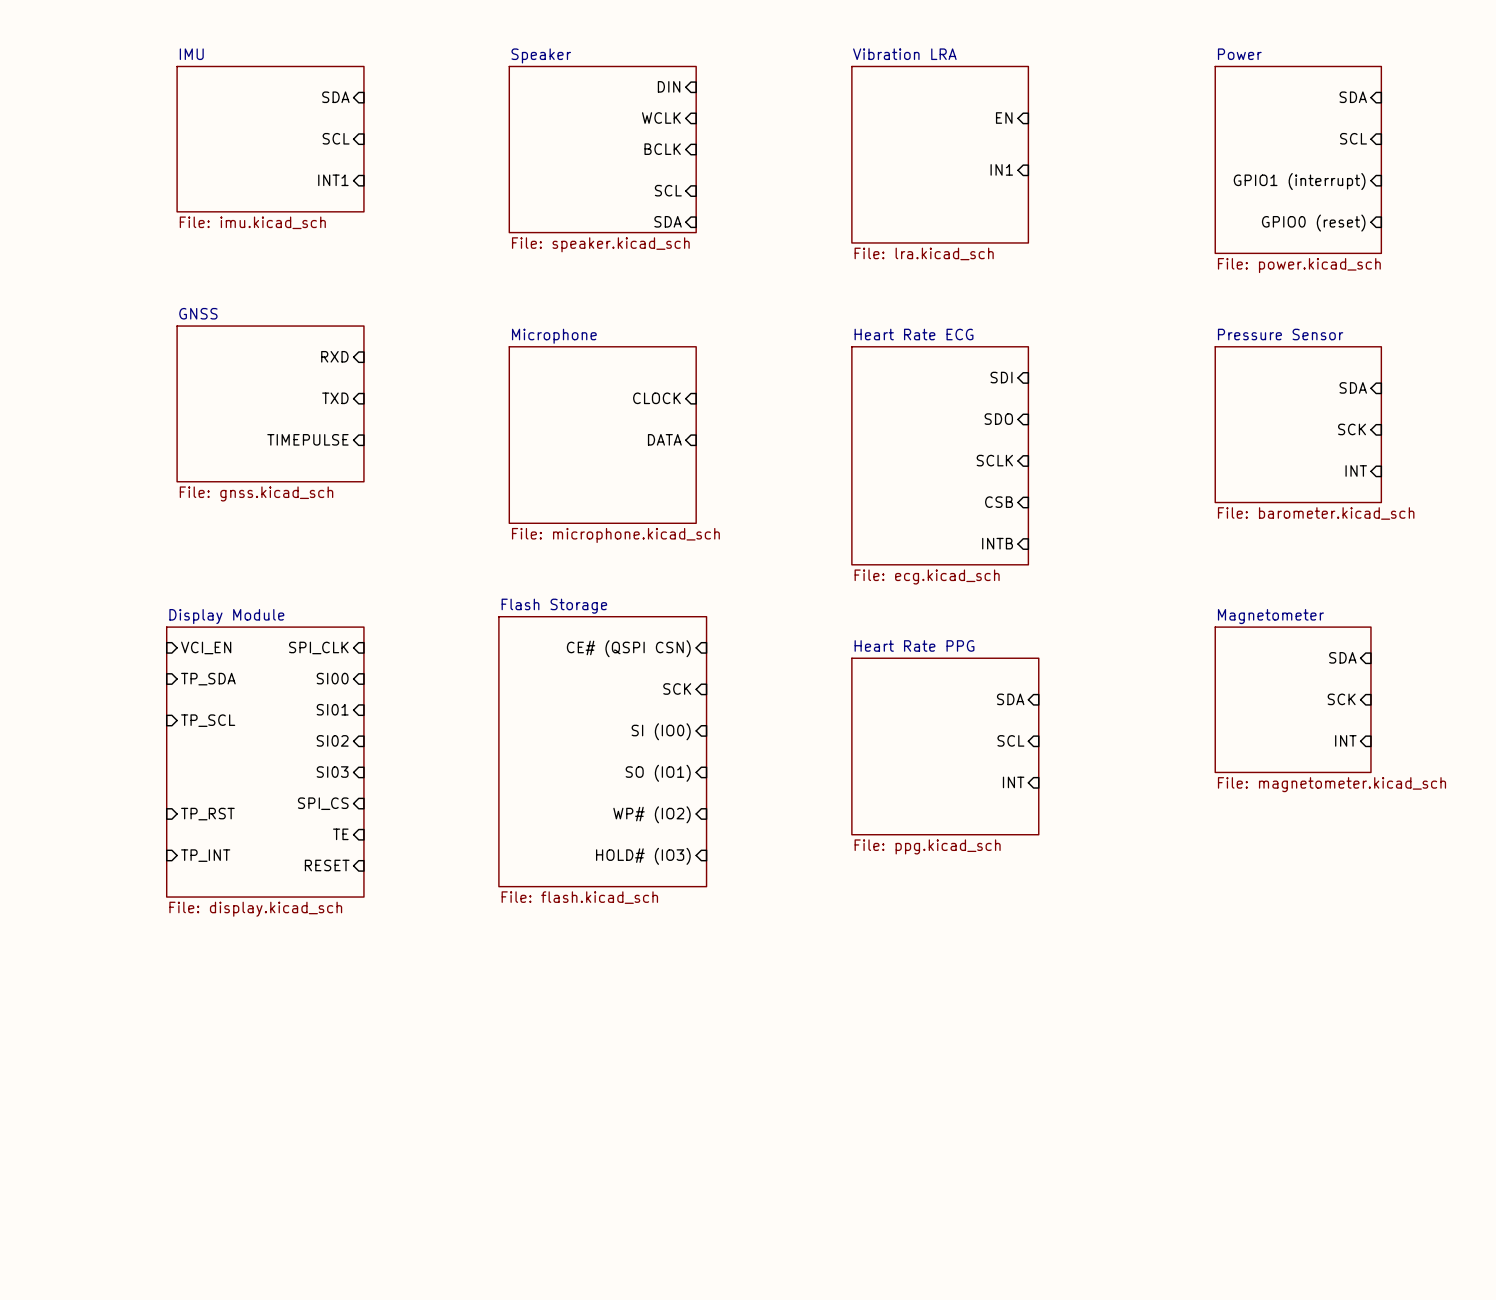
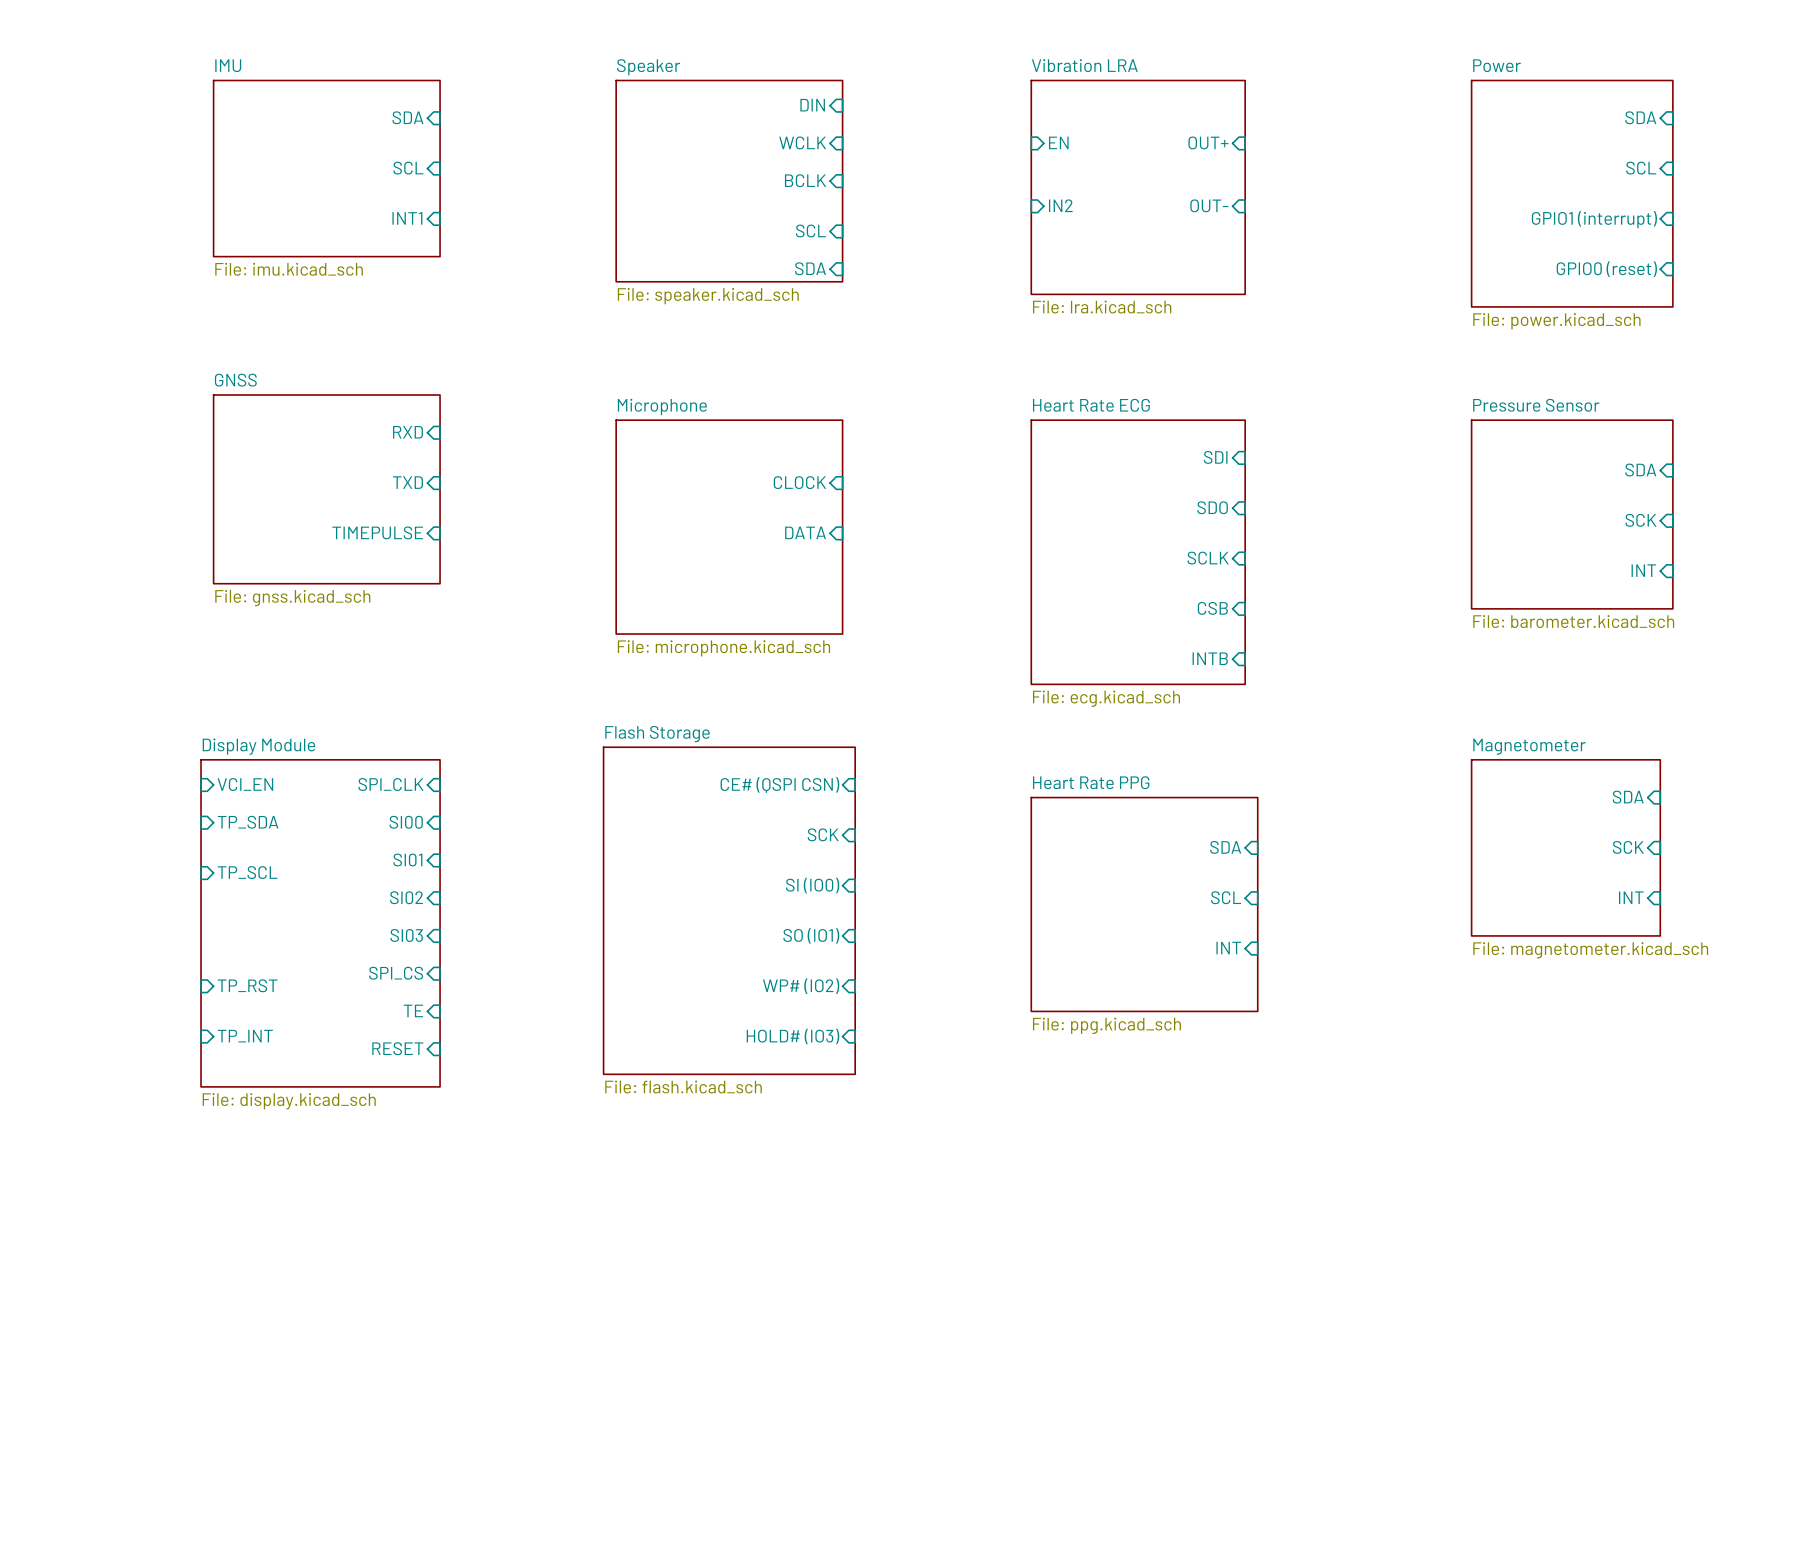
sheet pin: none -> EN (1058, 142)
sheet pin: EN (1004, 118) -> OUT+ (1208, 142)
sheet pin: none -> IN2 (1060, 205)
sheet pin: IN1 (1001, 169) -> OUT- (1209, 205)

